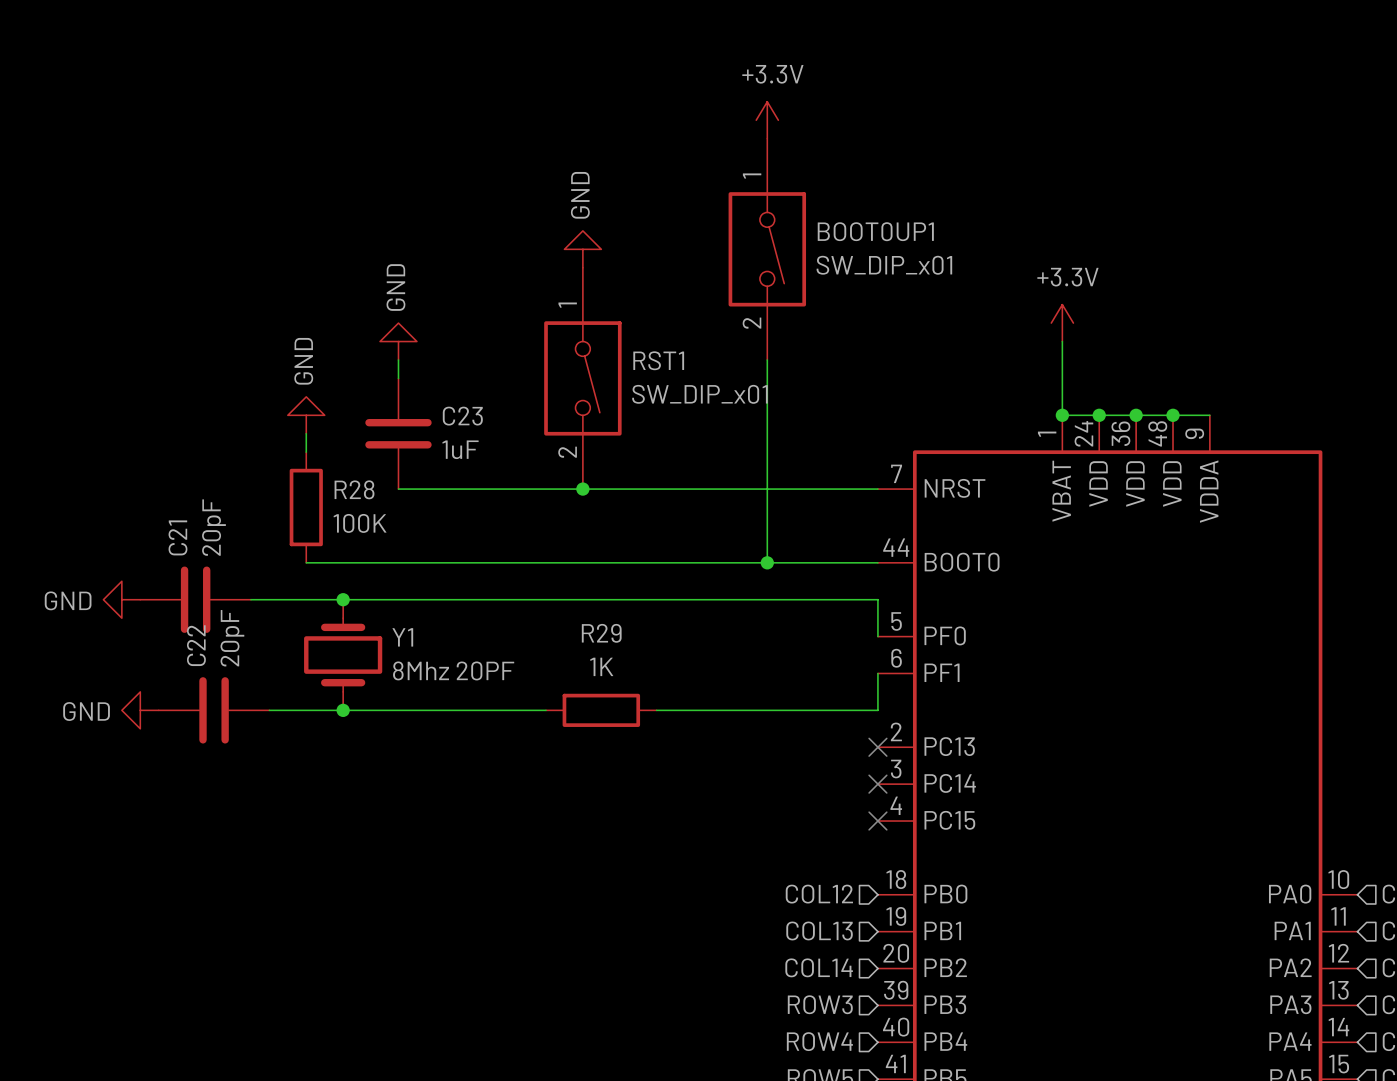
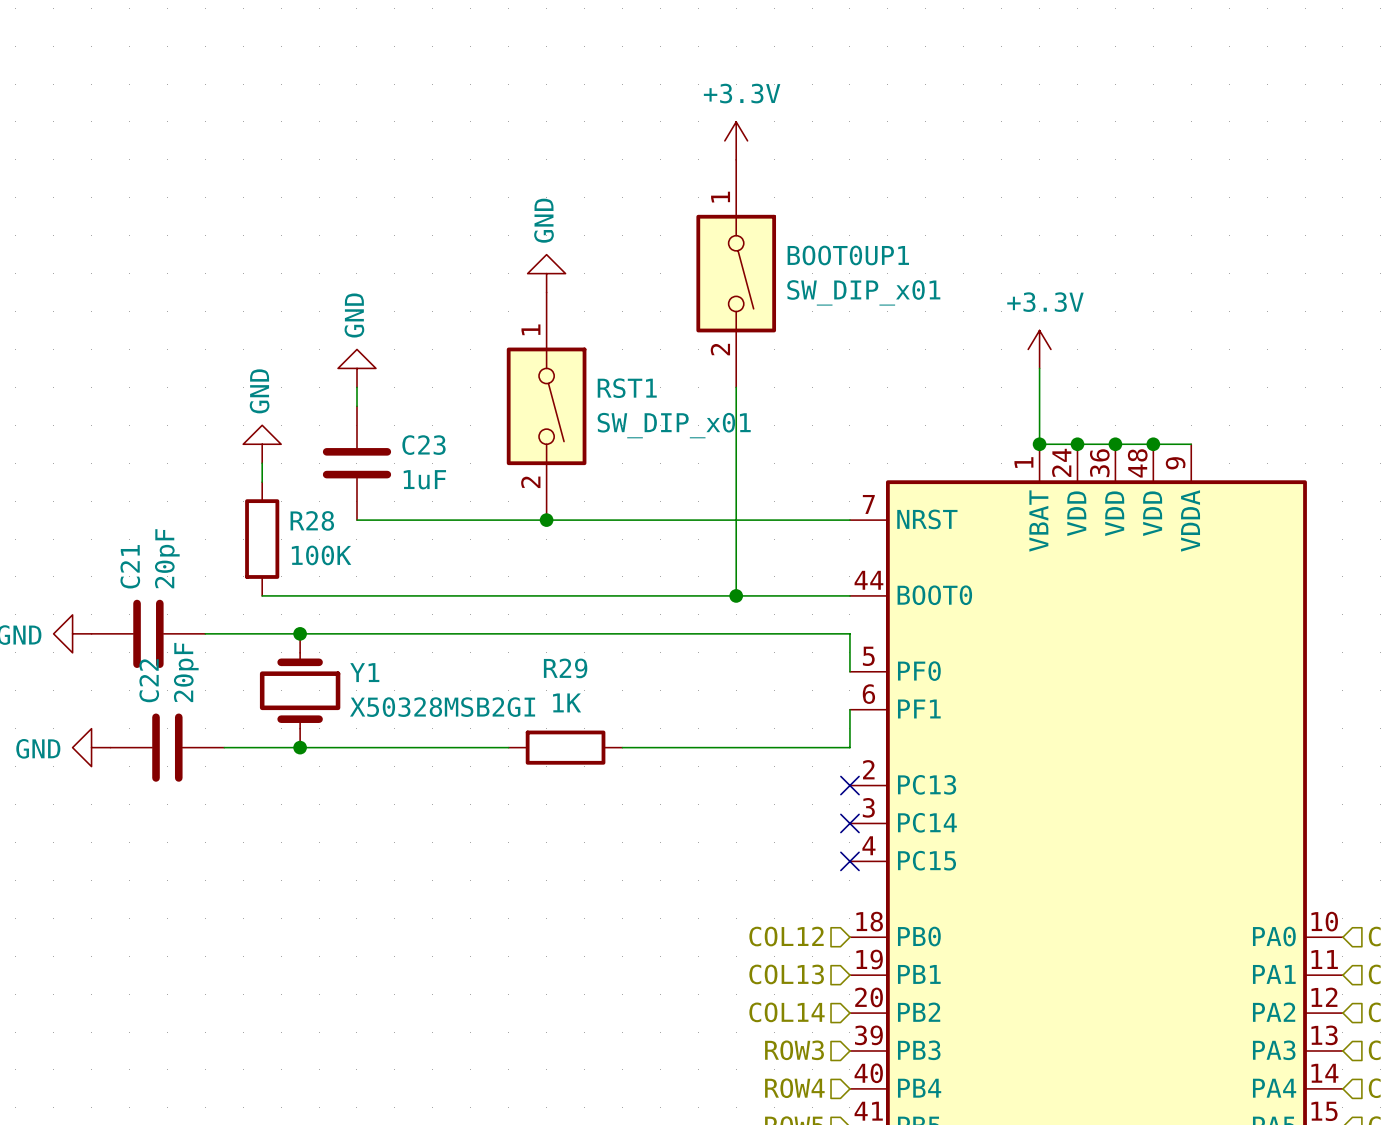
Y1 value: 8Mhz 20PF (453, 670) -> X50328MSB2GI (442, 707)

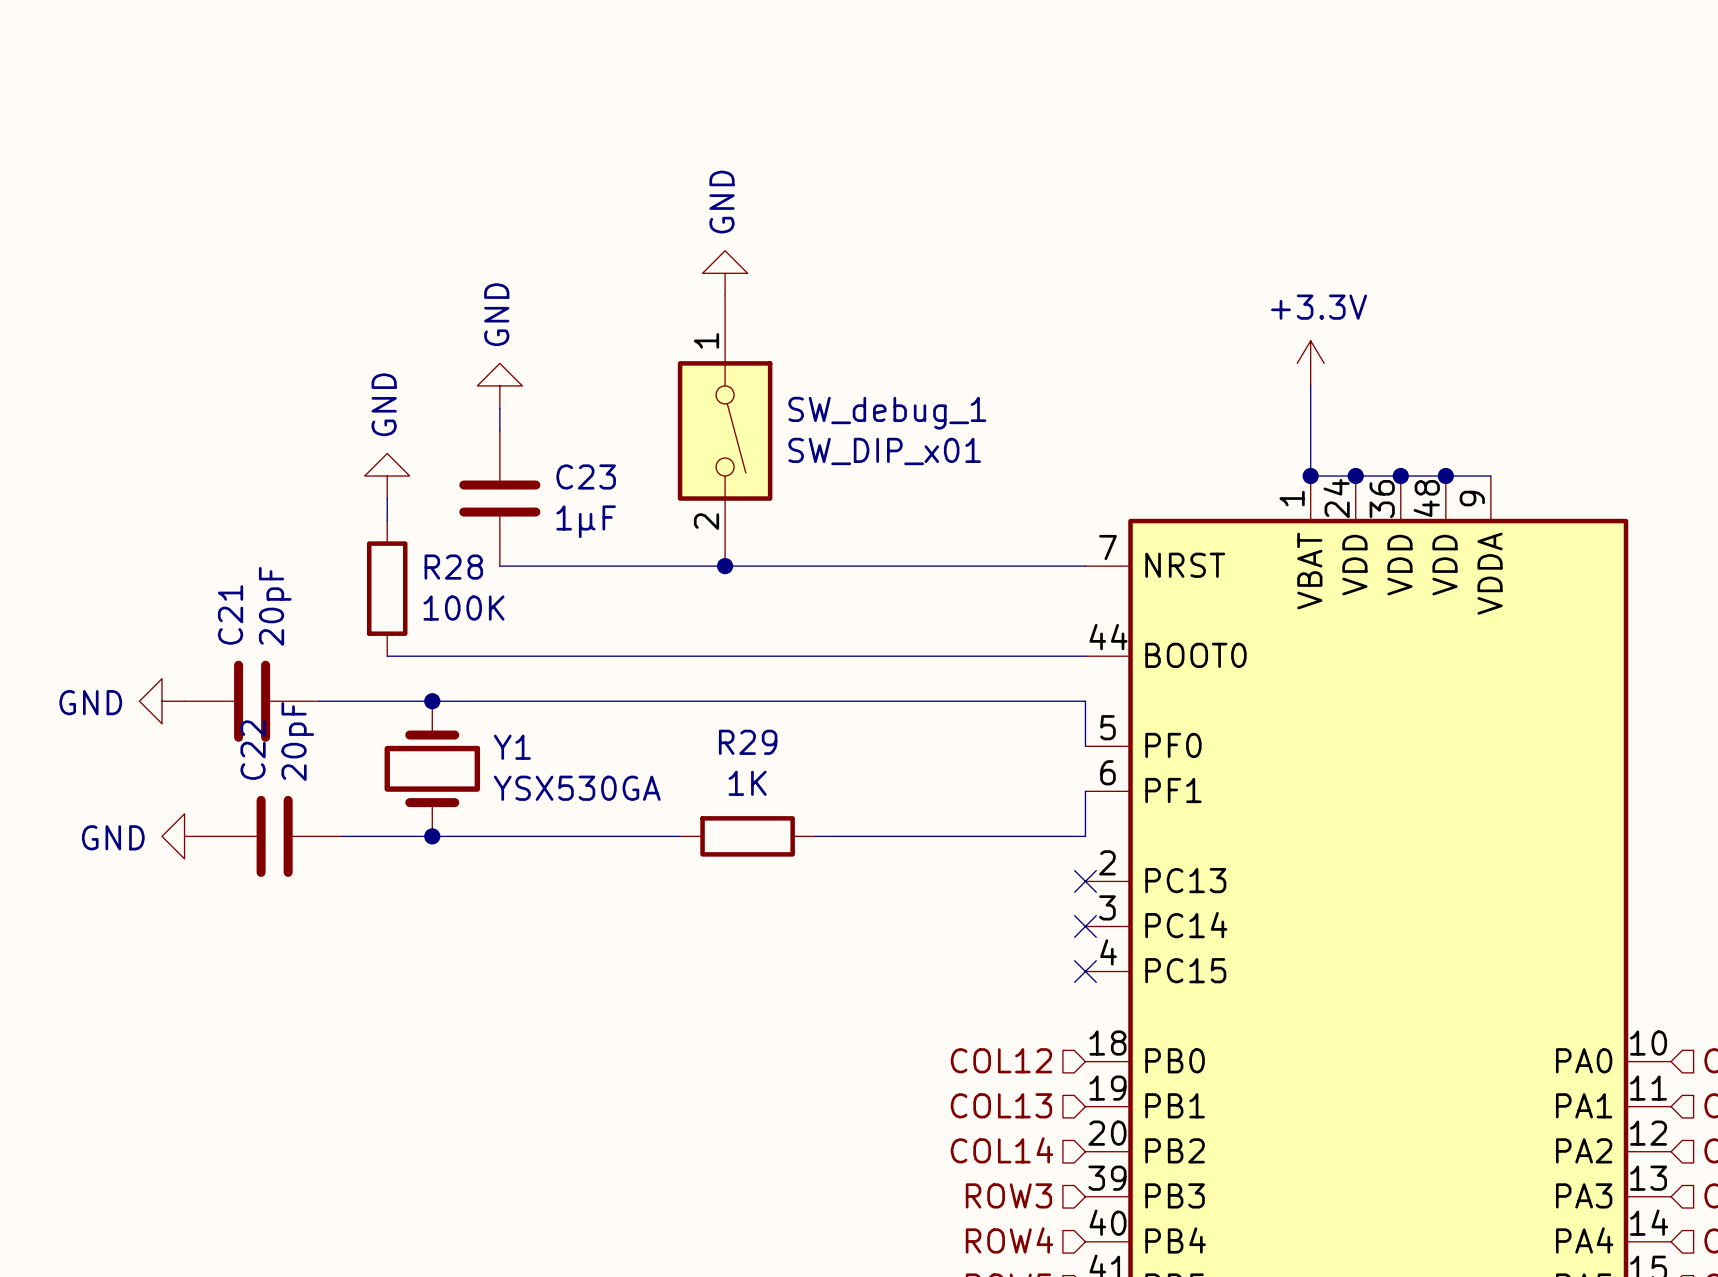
power symbol: +3.3V (736, 140) -> none
BOOT0UP1: SW_DIP_x01 (736, 273) -> none
wire: (736, 387) (736, 595) -> none
RST1 name: RST1 (627, 388) -> SW_debug_1 (887, 413)
C23 value: 1uF (424, 479) -> 1μF (586, 521)
junction: (736, 595) -> none
Y1 value: X50328MSB2GI (442, 707) -> YSX530GA (577, 788)

